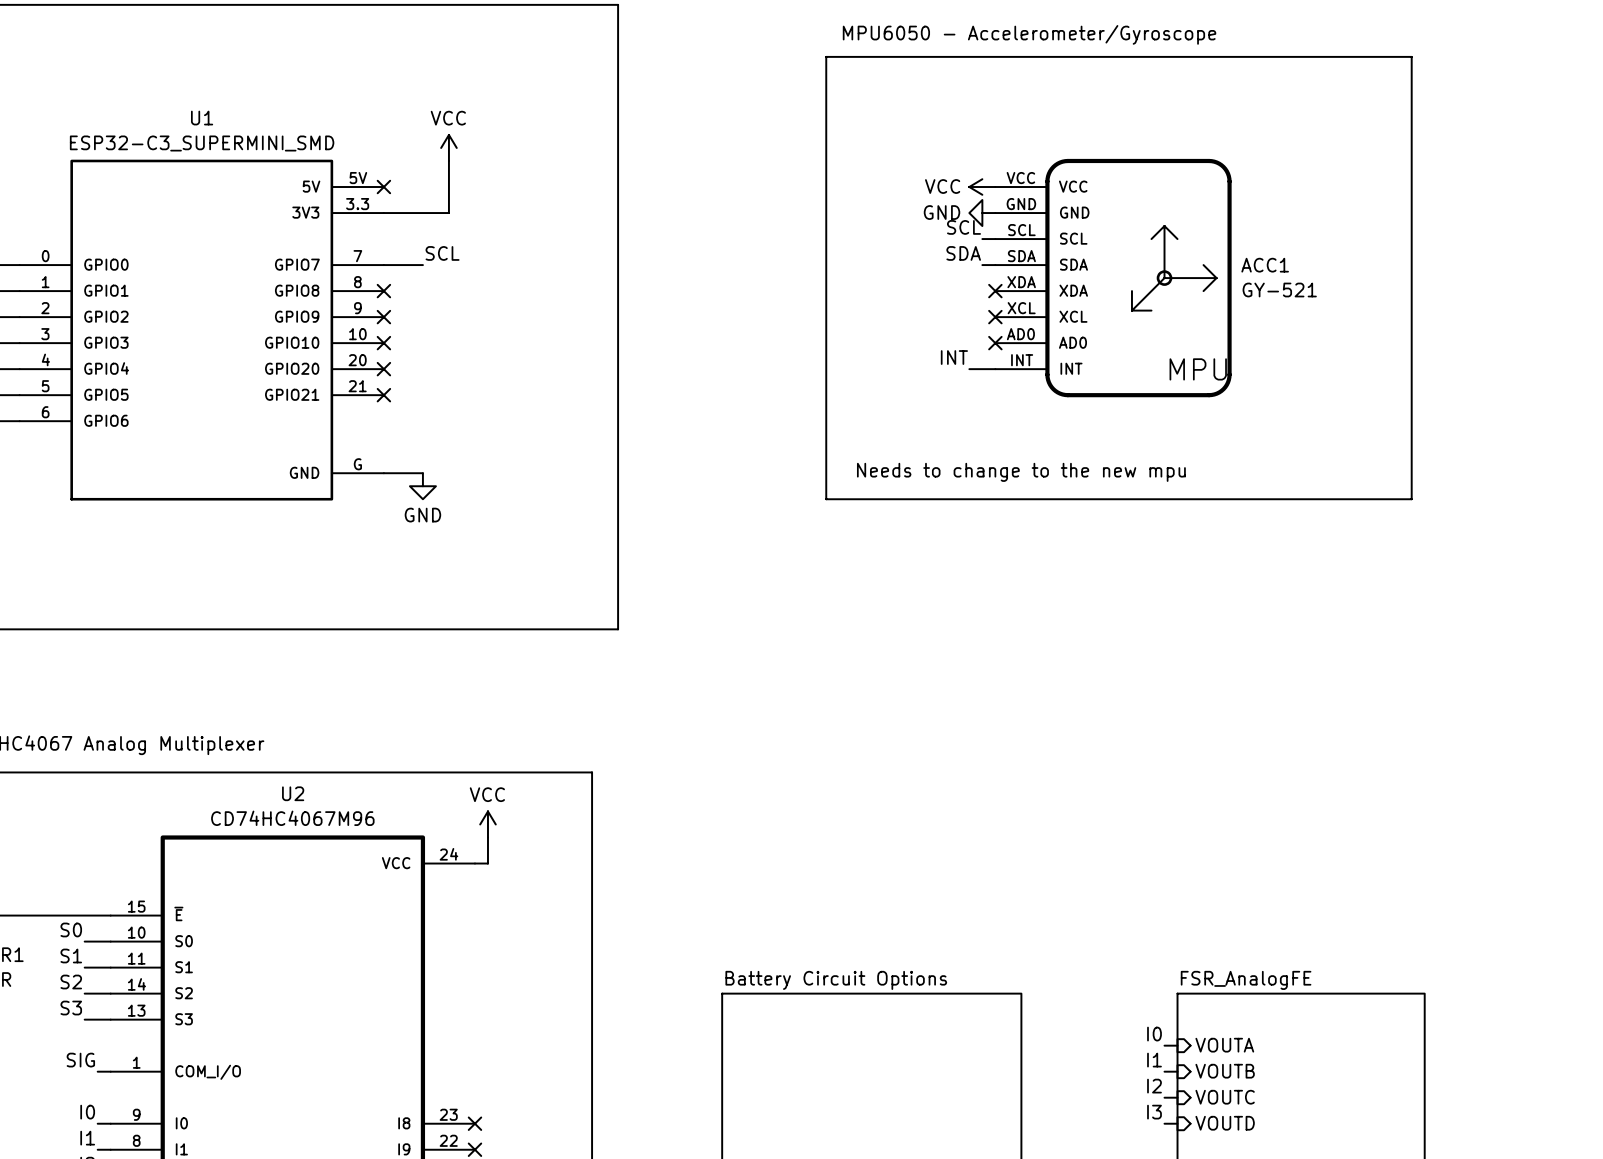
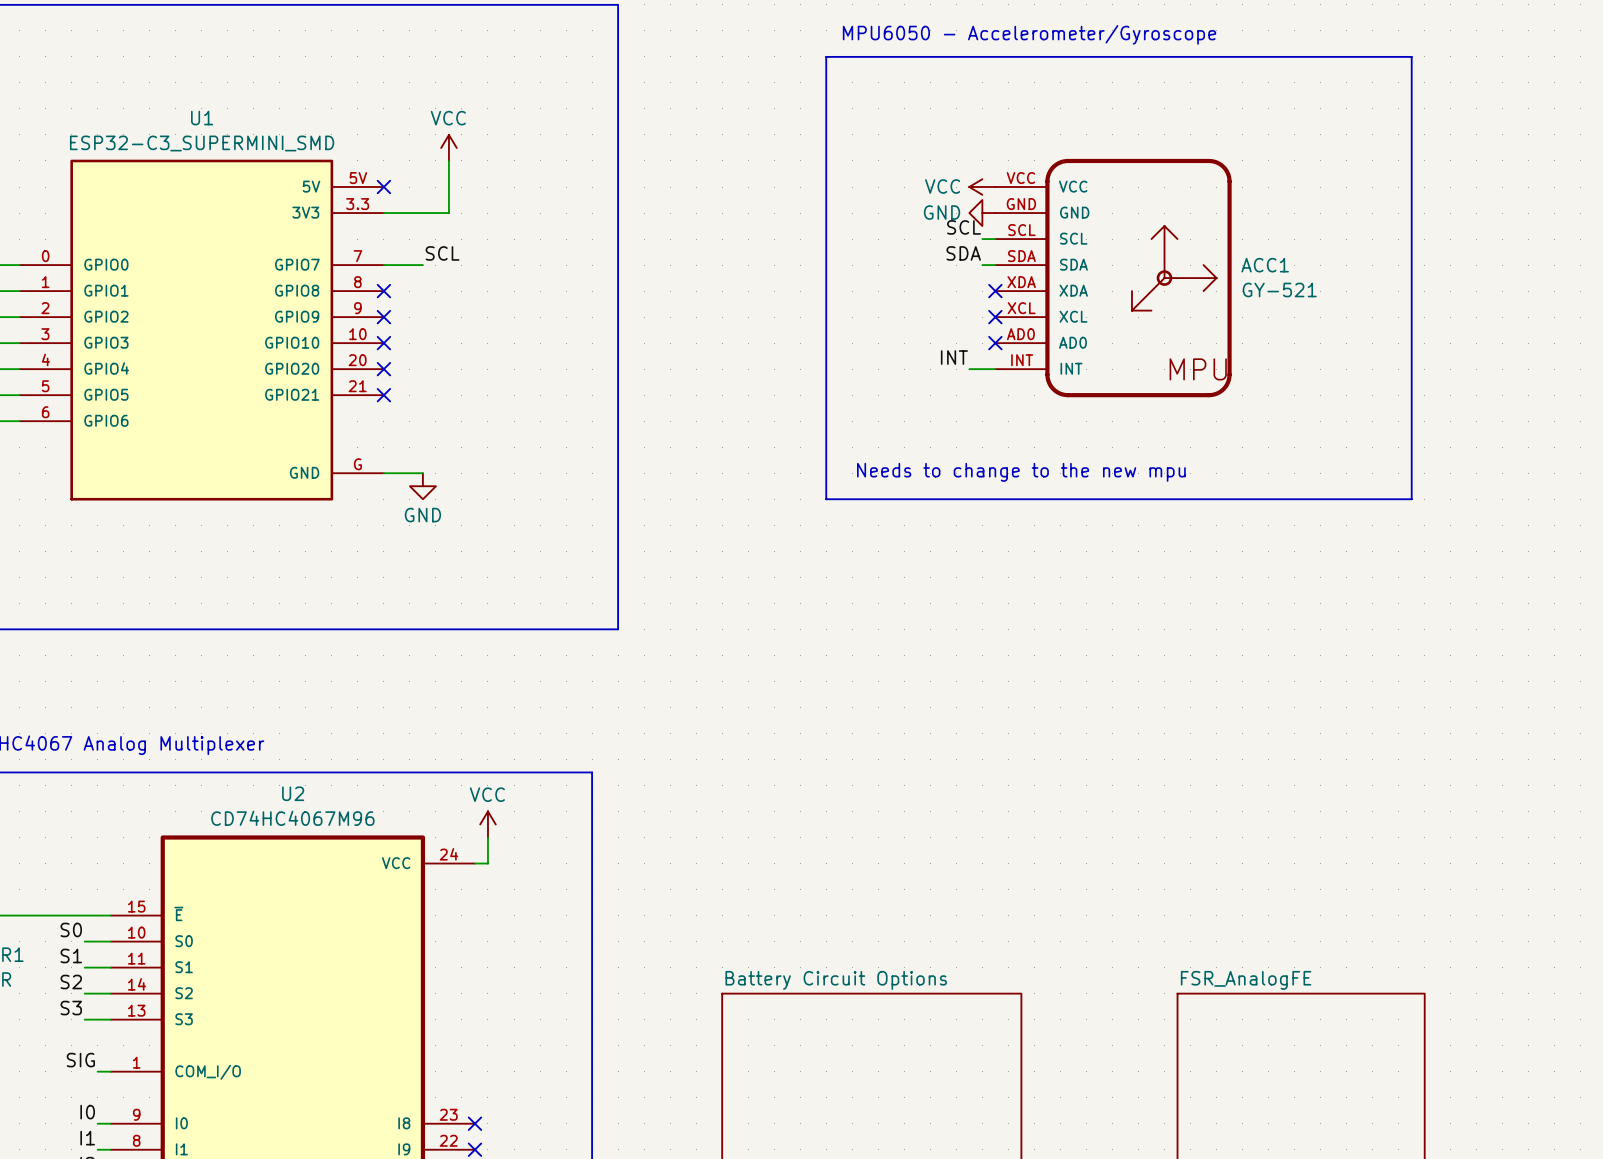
label: I0 (1154, 1034) -> none
wire: (1164, 1045) (1177, 1045) -> none
sheet pin: VOUTA (1224, 1045) -> none
label: I1 (1154, 1060) -> none
wire: (1164, 1071) (1177, 1071) -> none
sheet pin: VOUTB (1225, 1071) -> none
label: I2 (1154, 1086) -> none
wire: (1164, 1097) (1177, 1097) -> none
sheet pin: VOUTC (1225, 1097) -> none
label: I3 (1154, 1112) -> none
wire: (1164, 1123) (1177, 1123) -> none
sheet pin: VOUTD (1225, 1123) -> none

